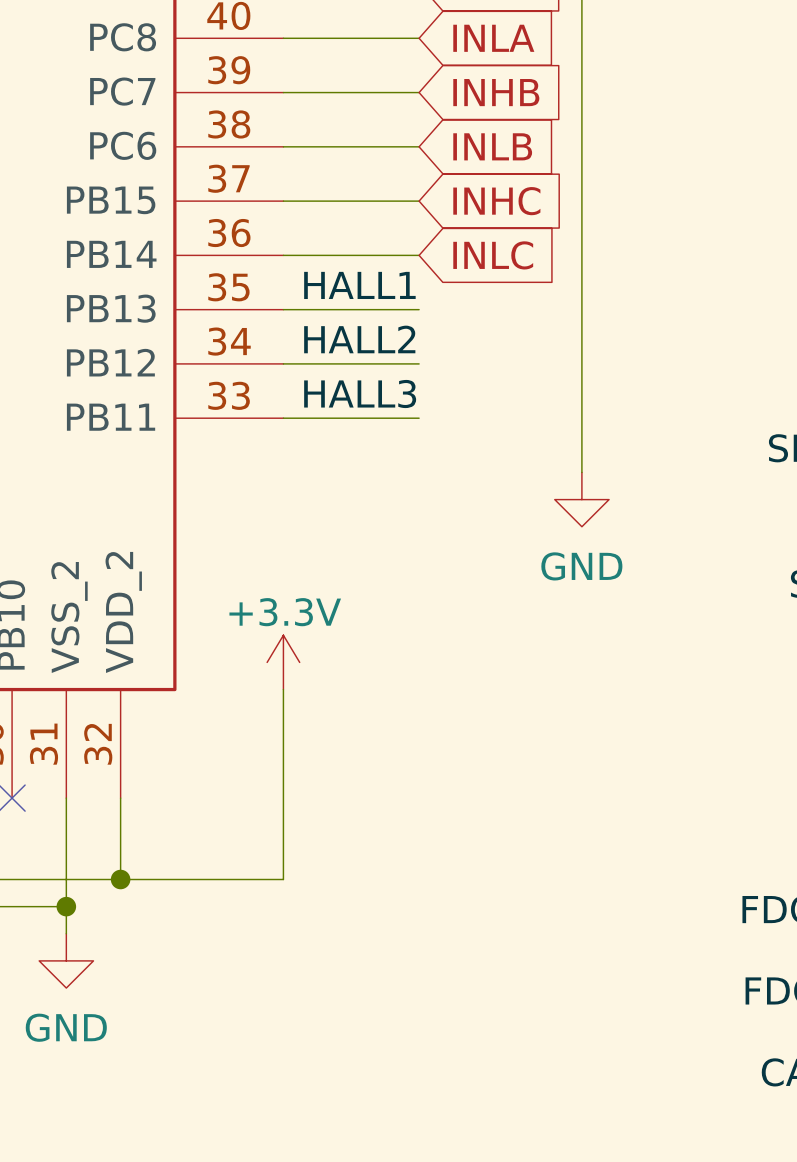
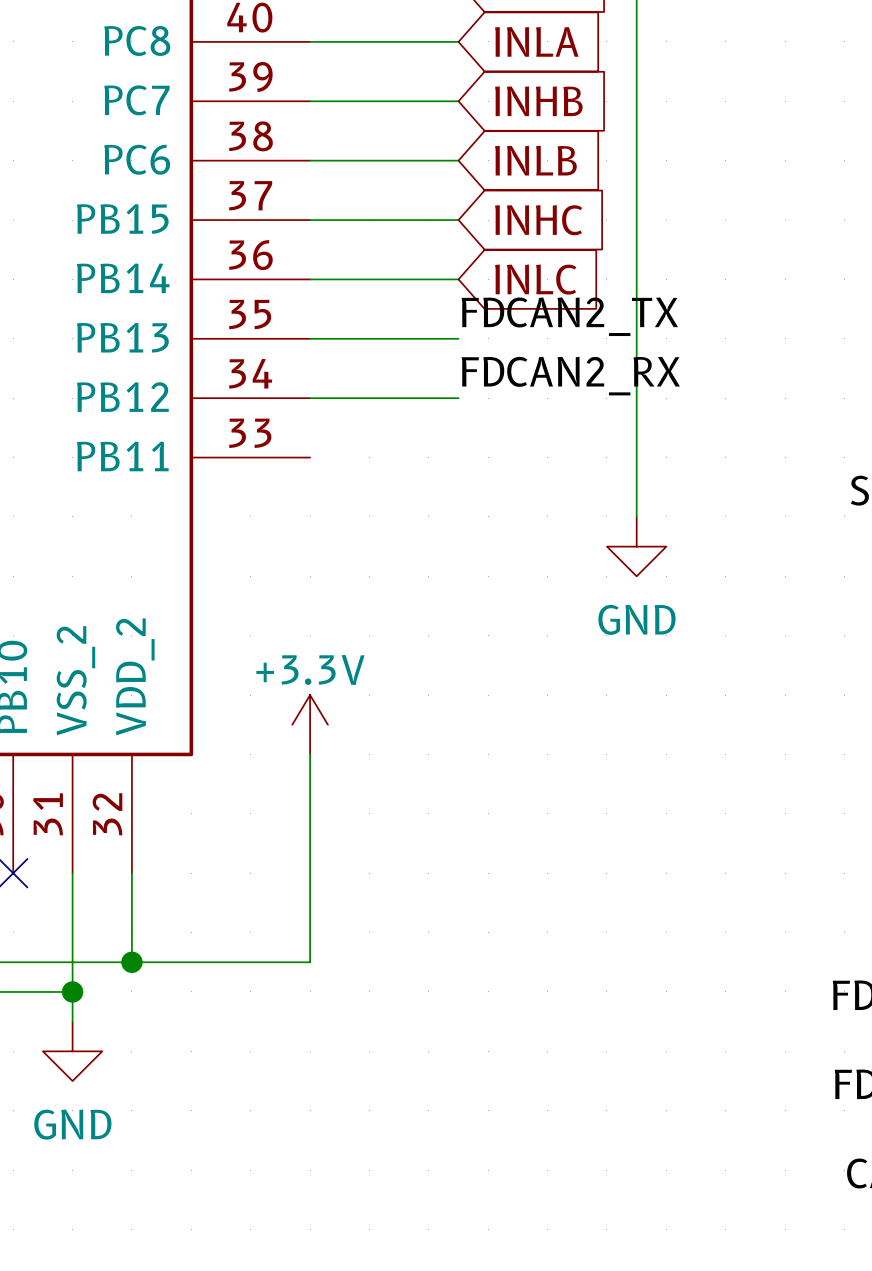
label: HALL1 (359, 285) -> FDCAN2_TX (569, 316)
label: HALL2 (359, 339) -> FDCAN2_RX (570, 376)
label: HALL3 (360, 394) -> none
wire: (283, 418) (419, 418) -> none

